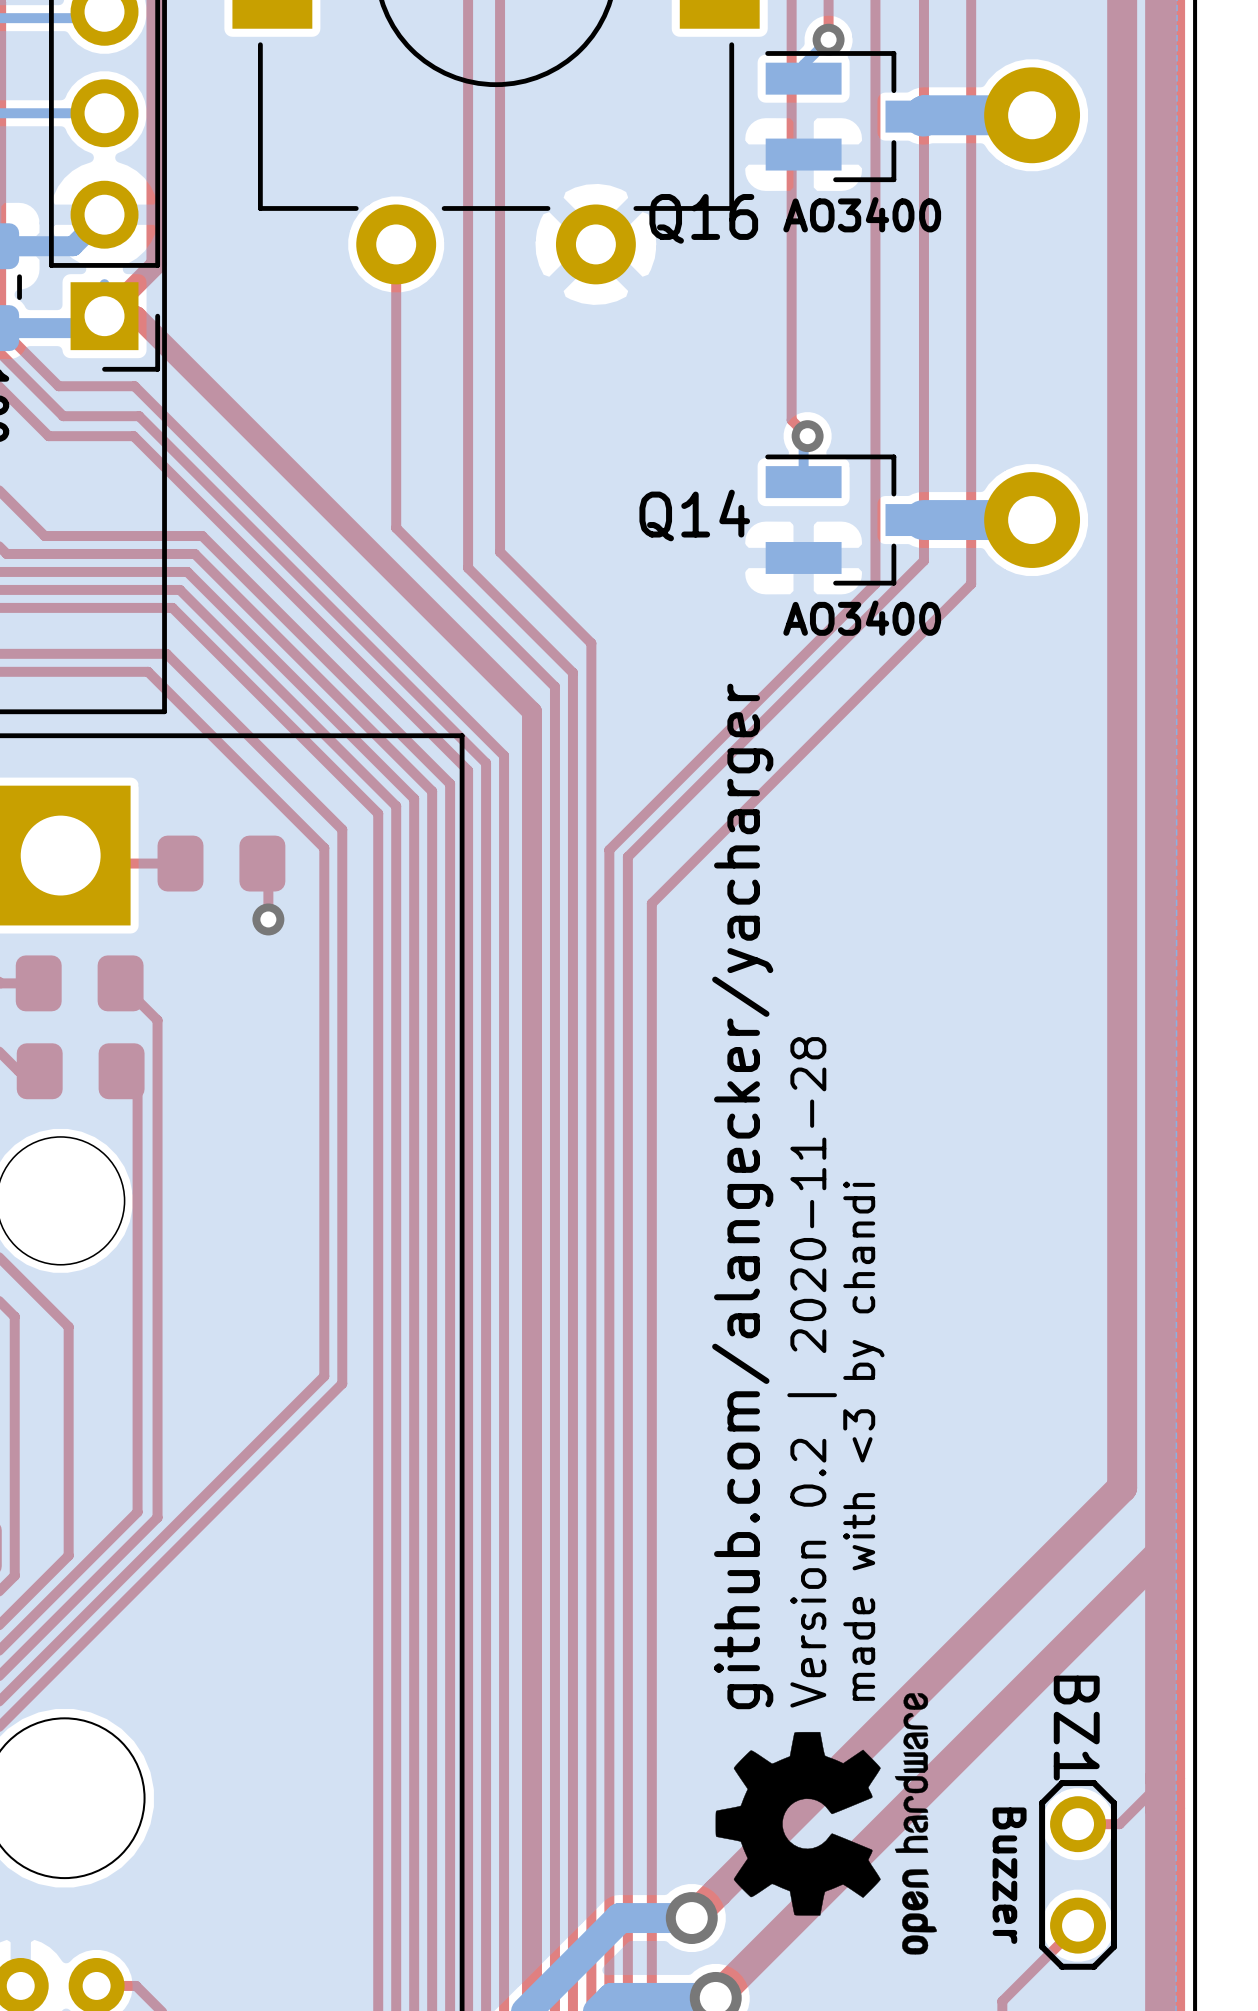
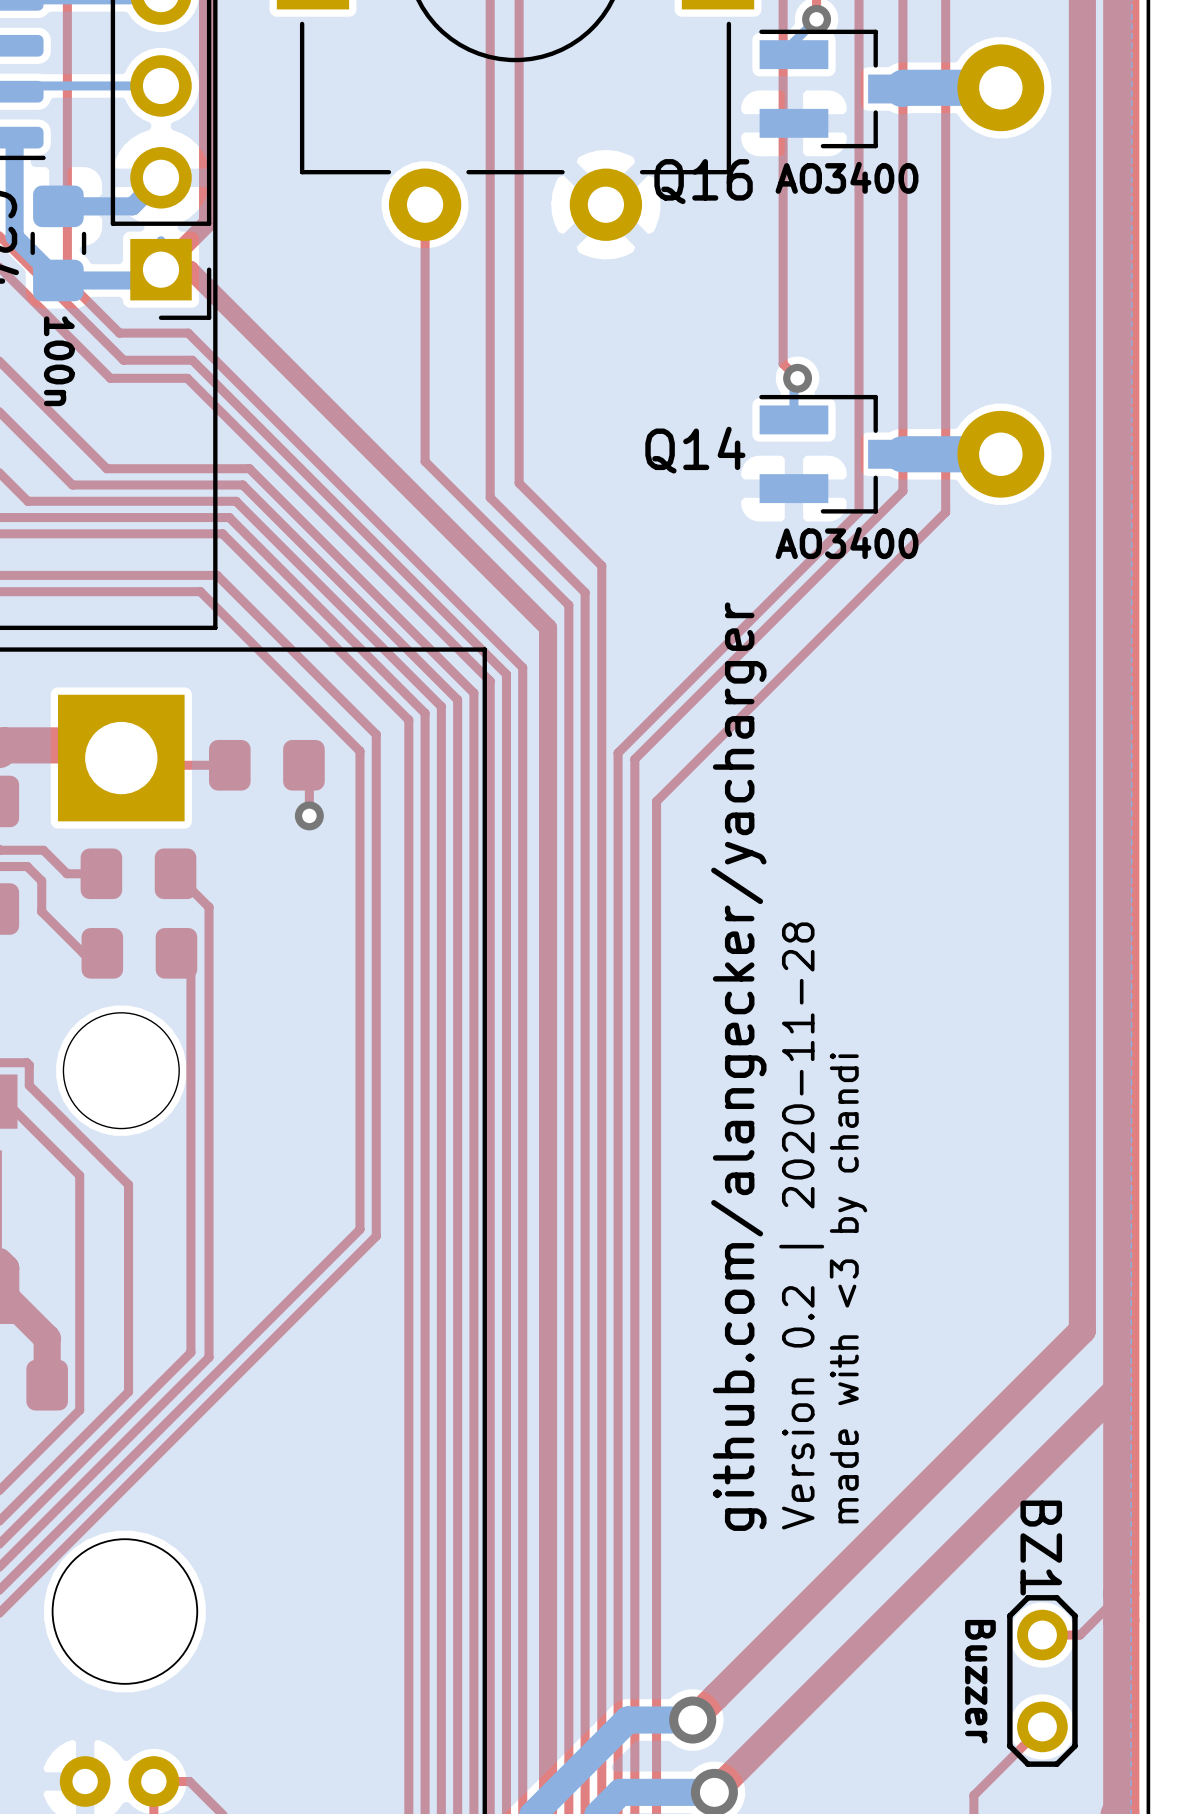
drawing: [715, 1693, 937, 1955] -> none

